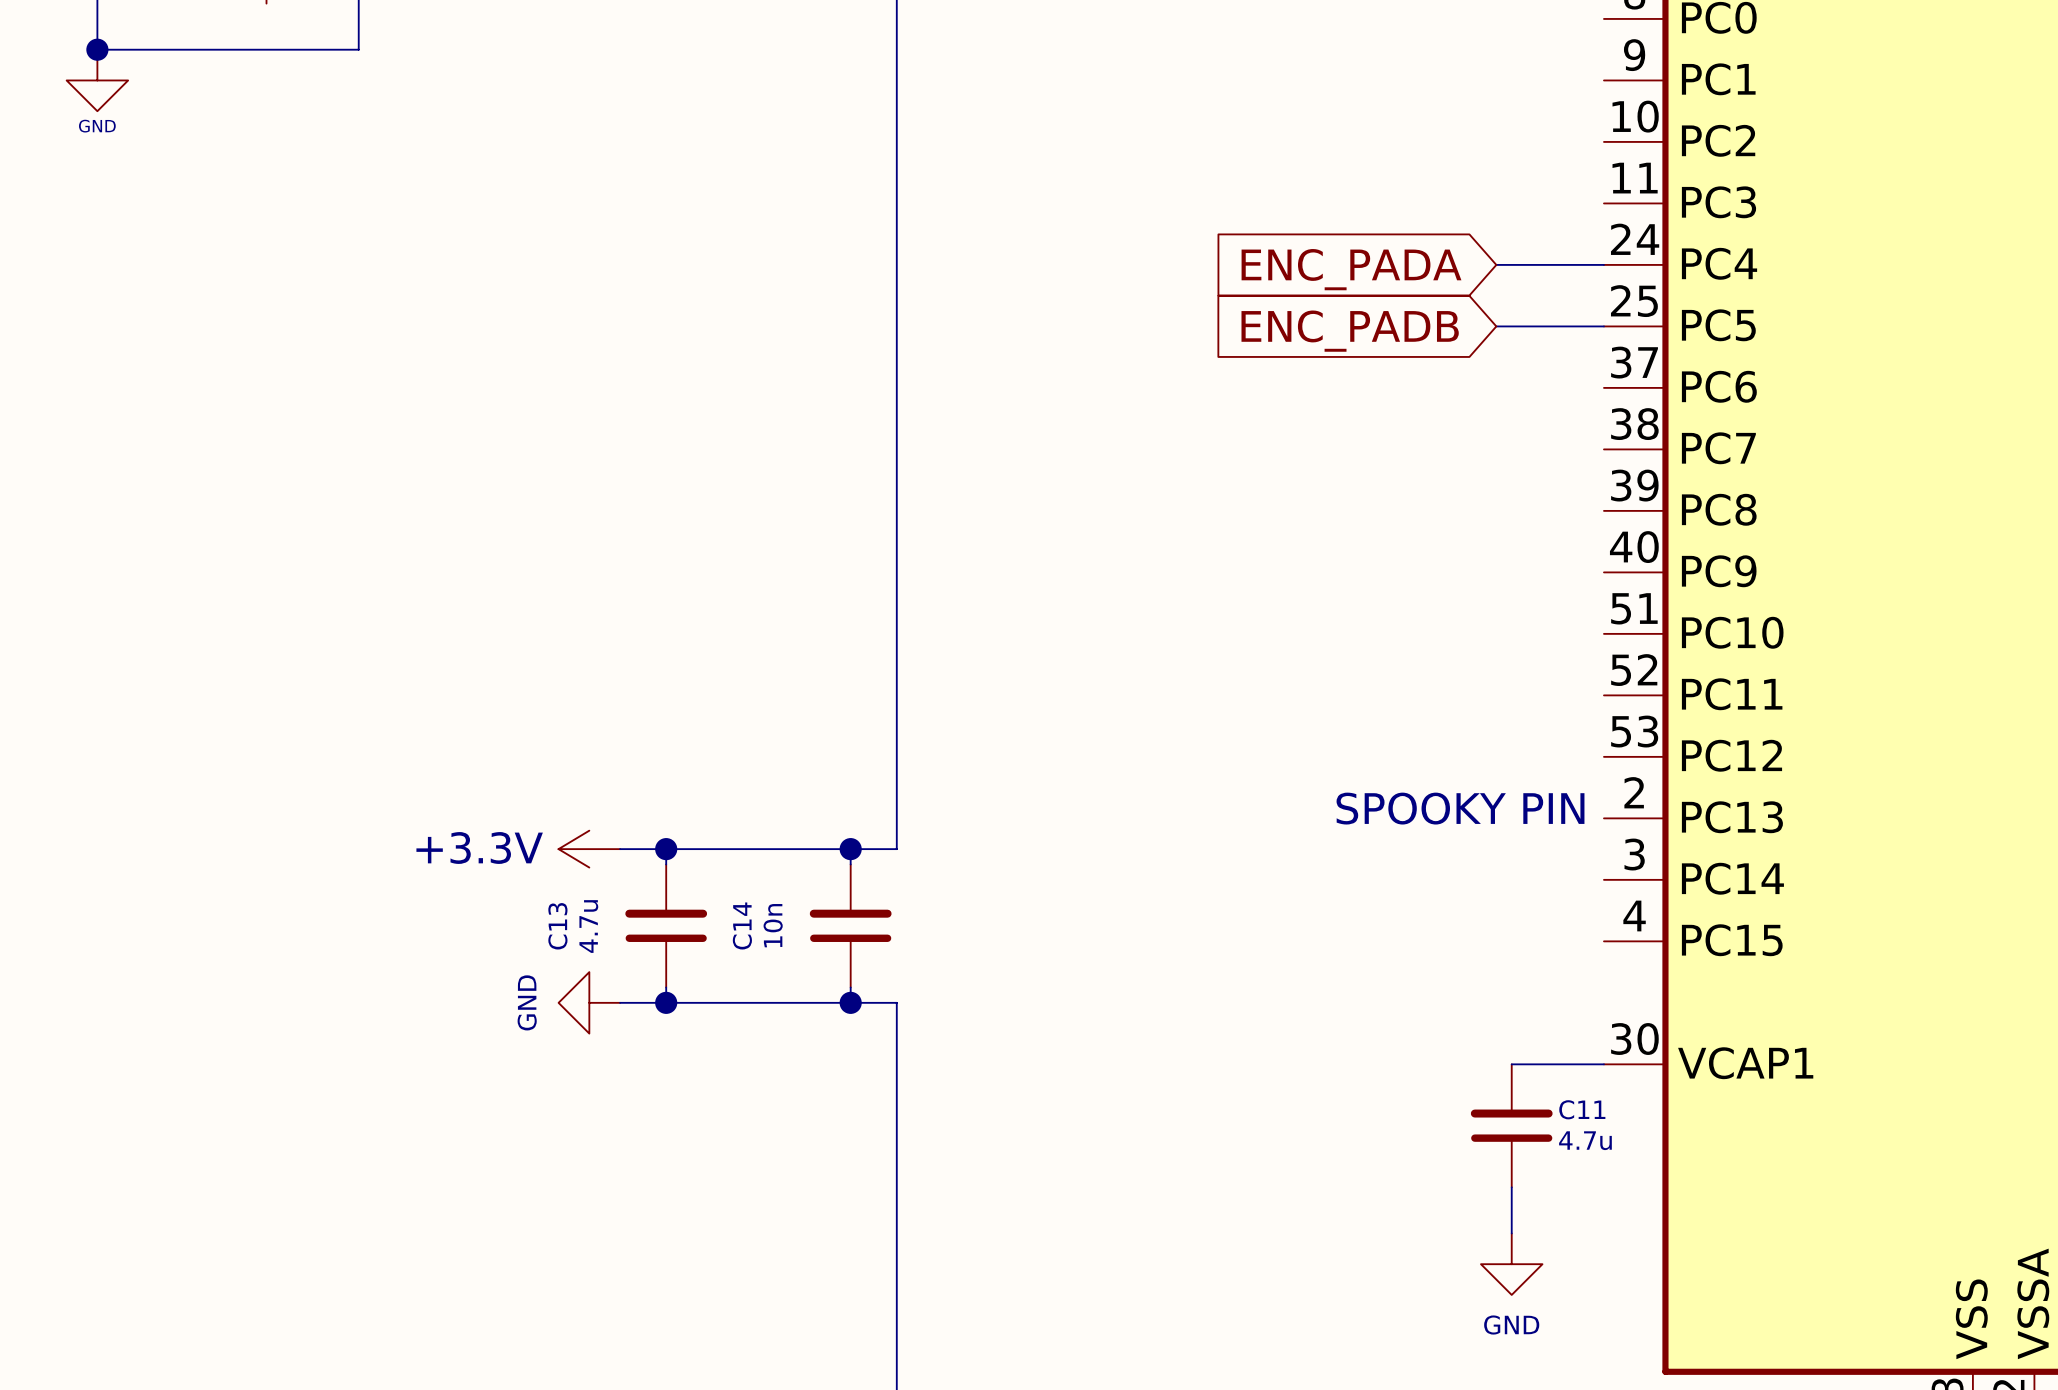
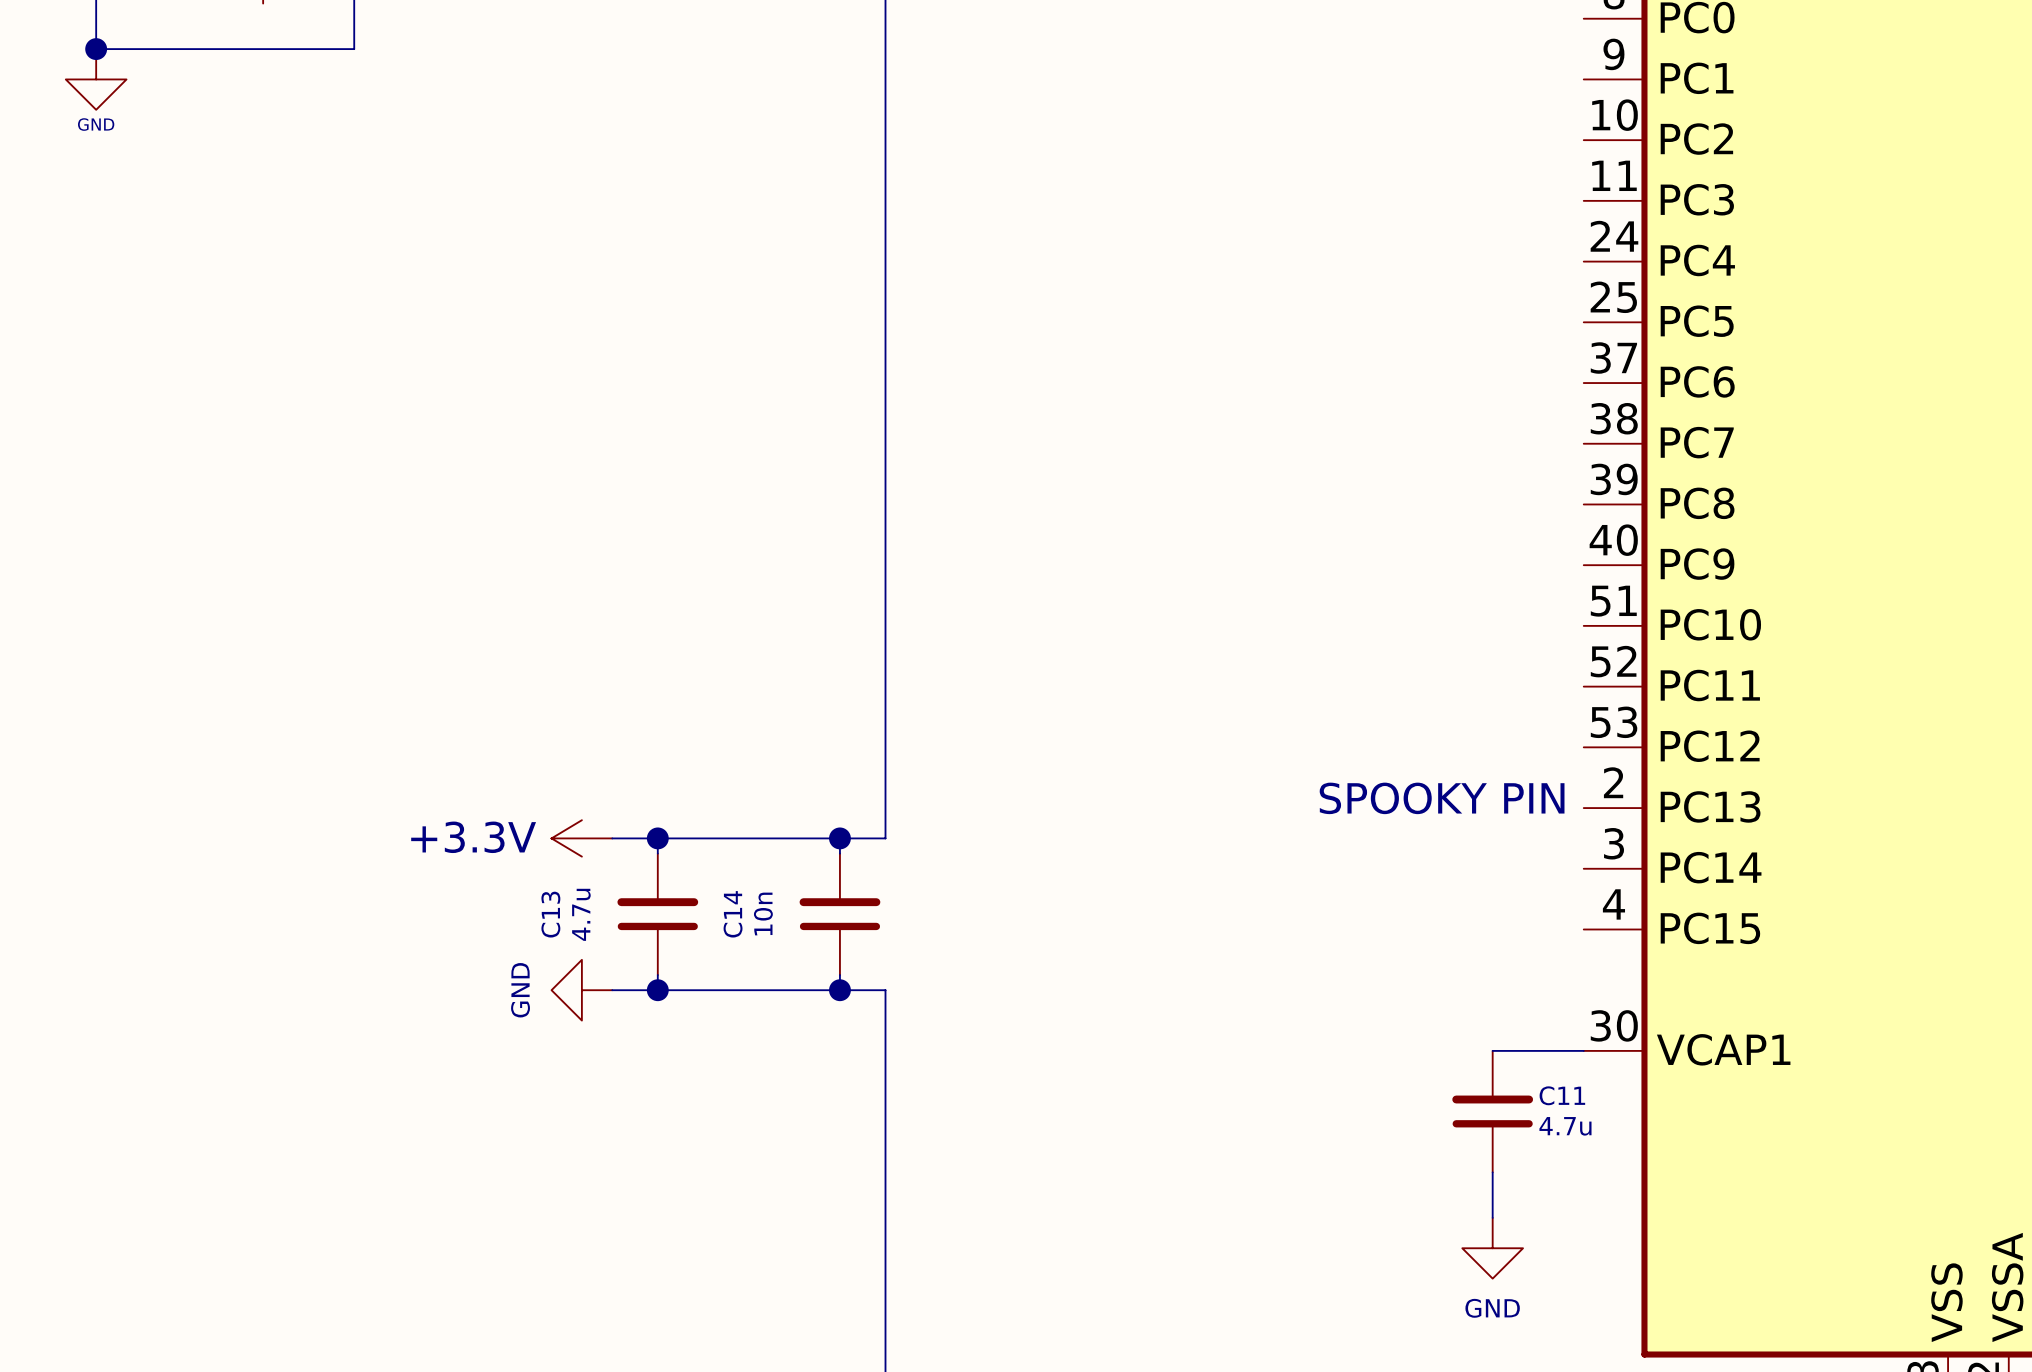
wire: (1496, 264) (1603, 264) -> none
global label: ENC_PADA (1351, 269) -> none
wire: (1496, 326) (1603, 326) -> none
global label: ENC_PADB (1350, 331) -> none

